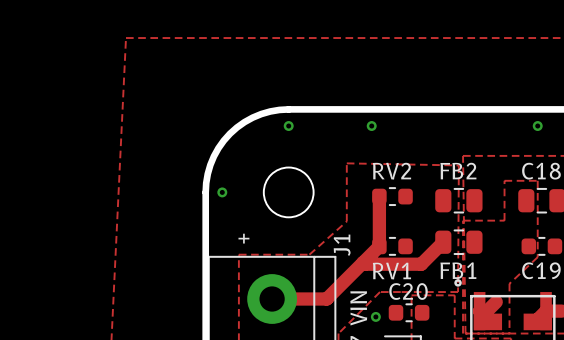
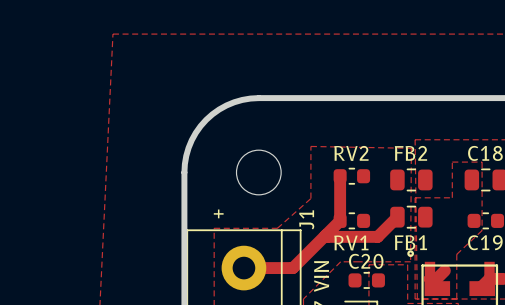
via: (288, 126) -> none
via: (371, 126) -> none
via: (537, 126) -> none
via: (222, 192) -> none
via: (375, 316) -> none

